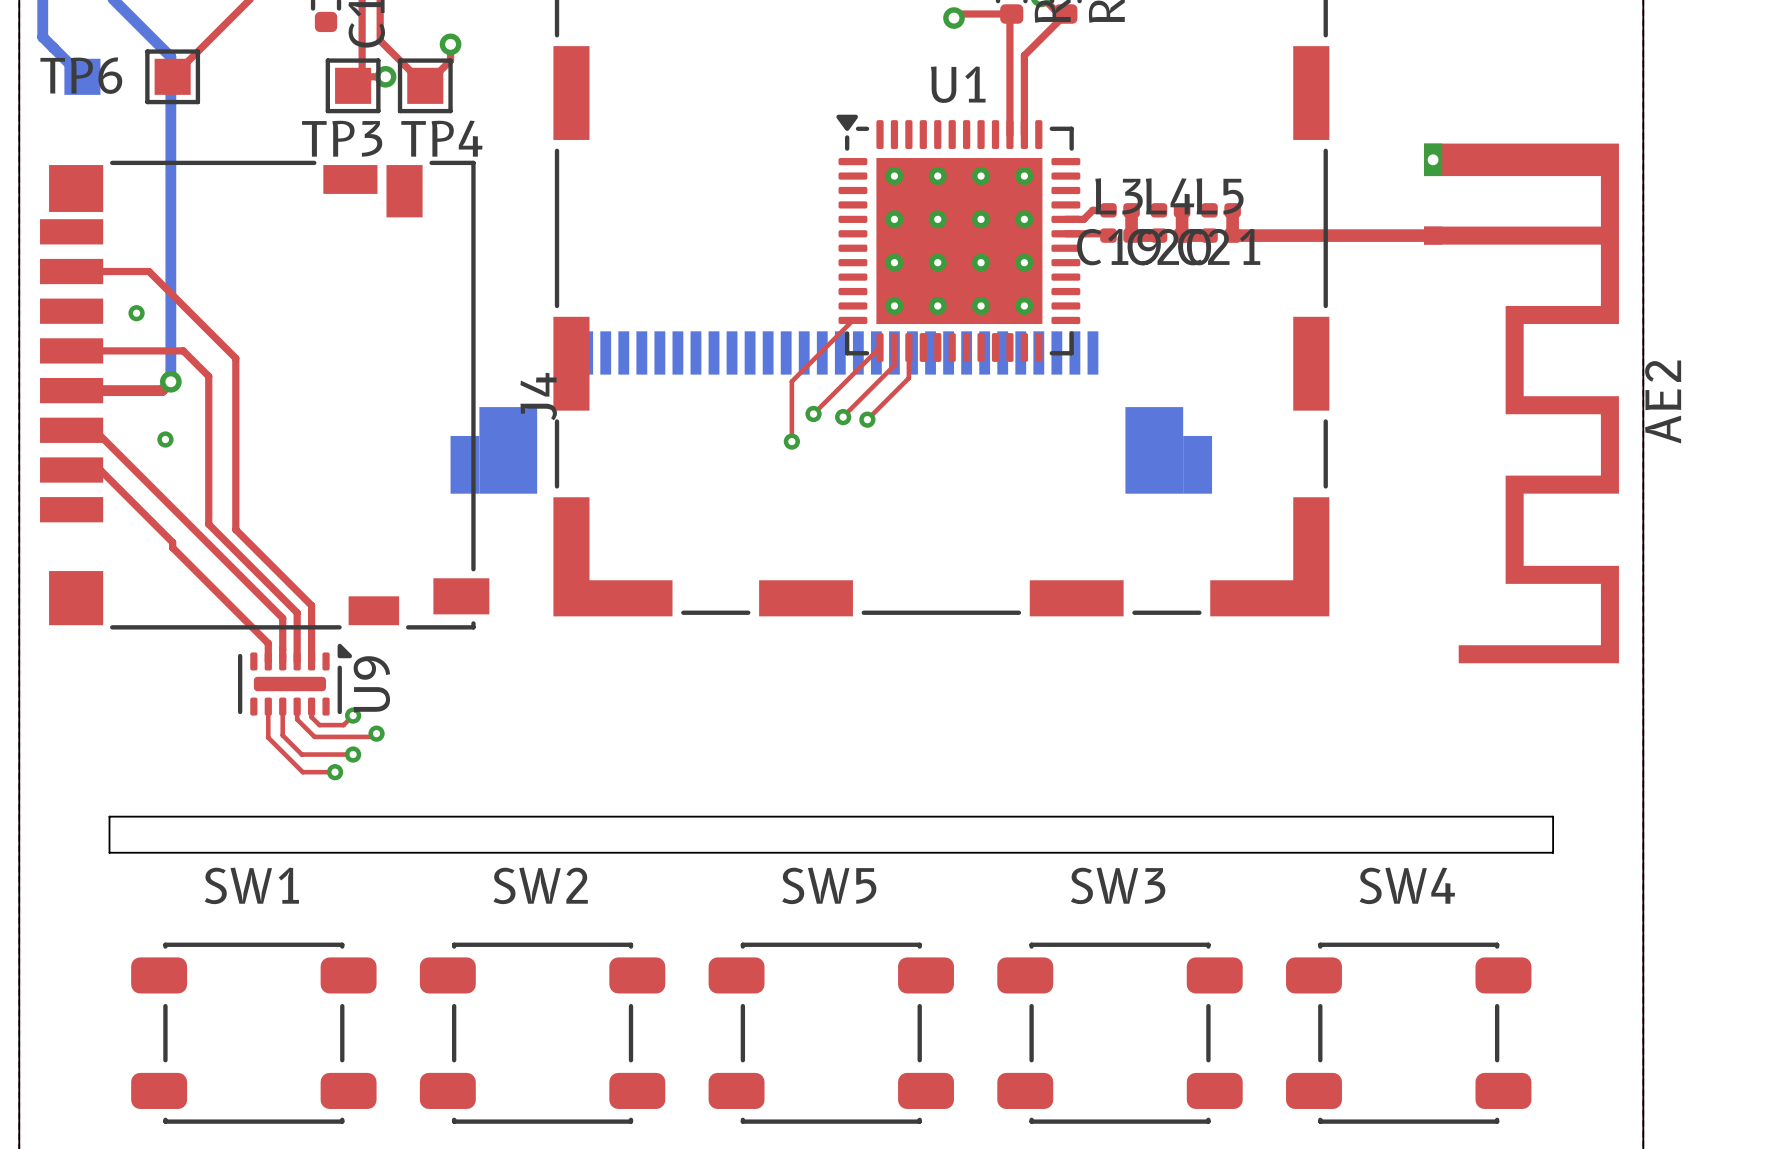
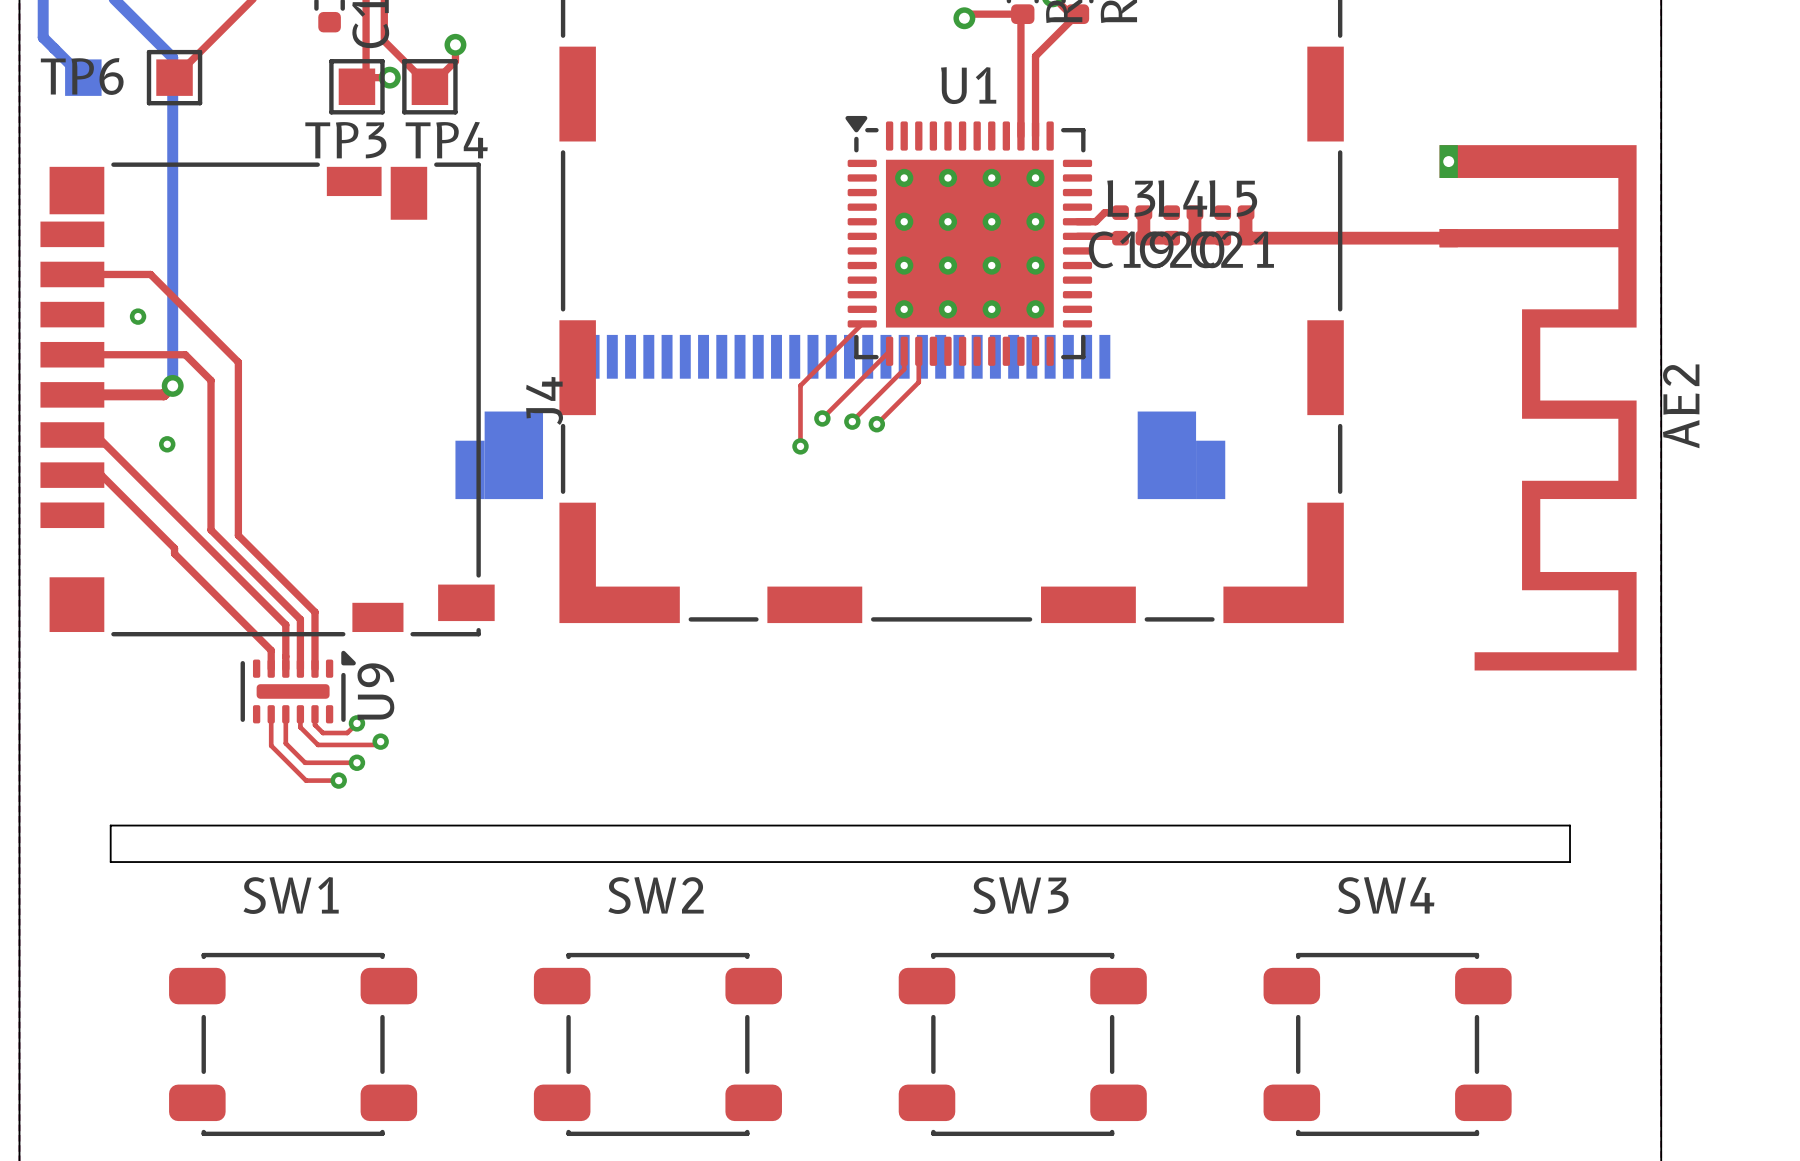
SW1 position: (253, 1033) -> (293, 1044)
SW2 position: (542, 1033) -> (657, 1044)
SW5: (831, 1033) -> none
SW3 position: (1120, 1033) -> (1022, 1044)
SW4 position: (1408, 1033) -> (1387, 1044)

